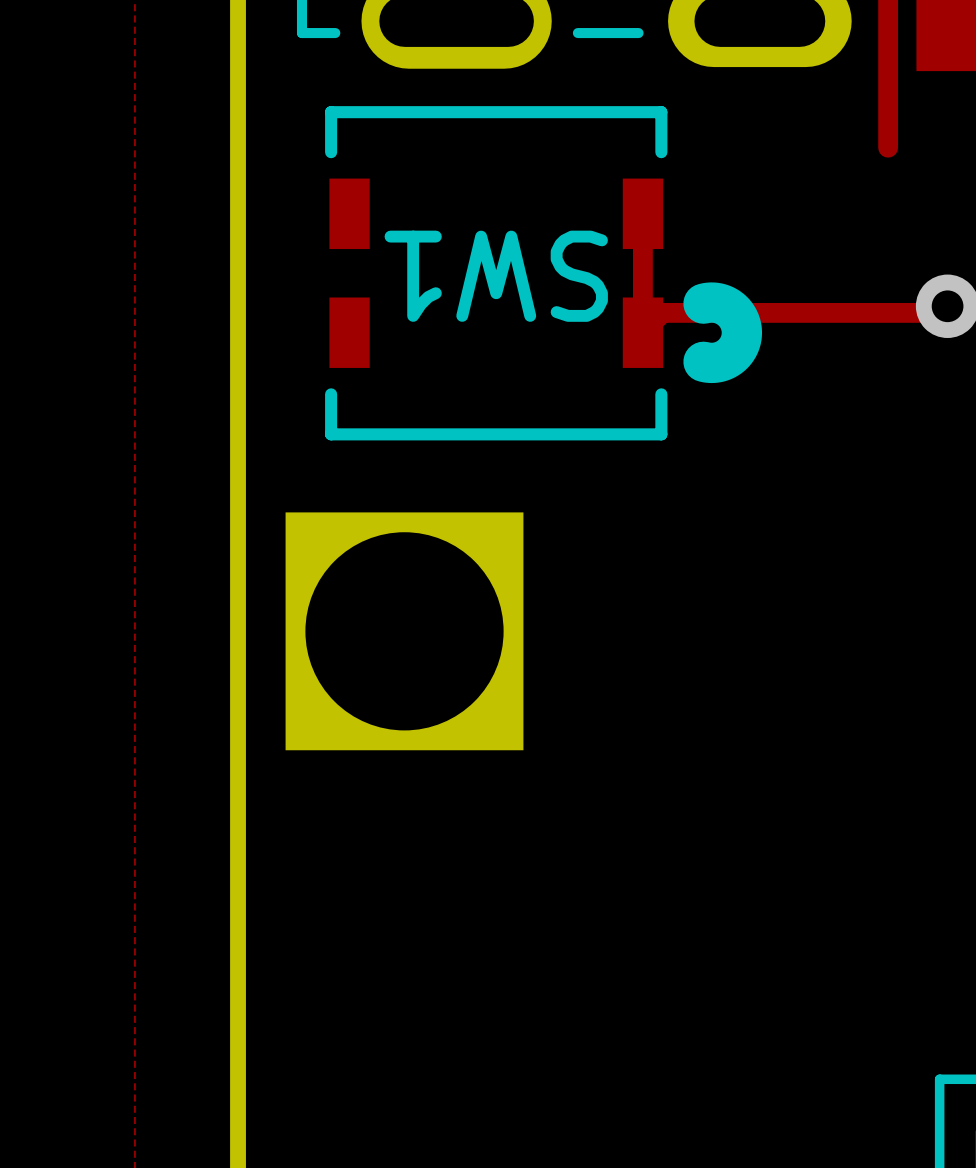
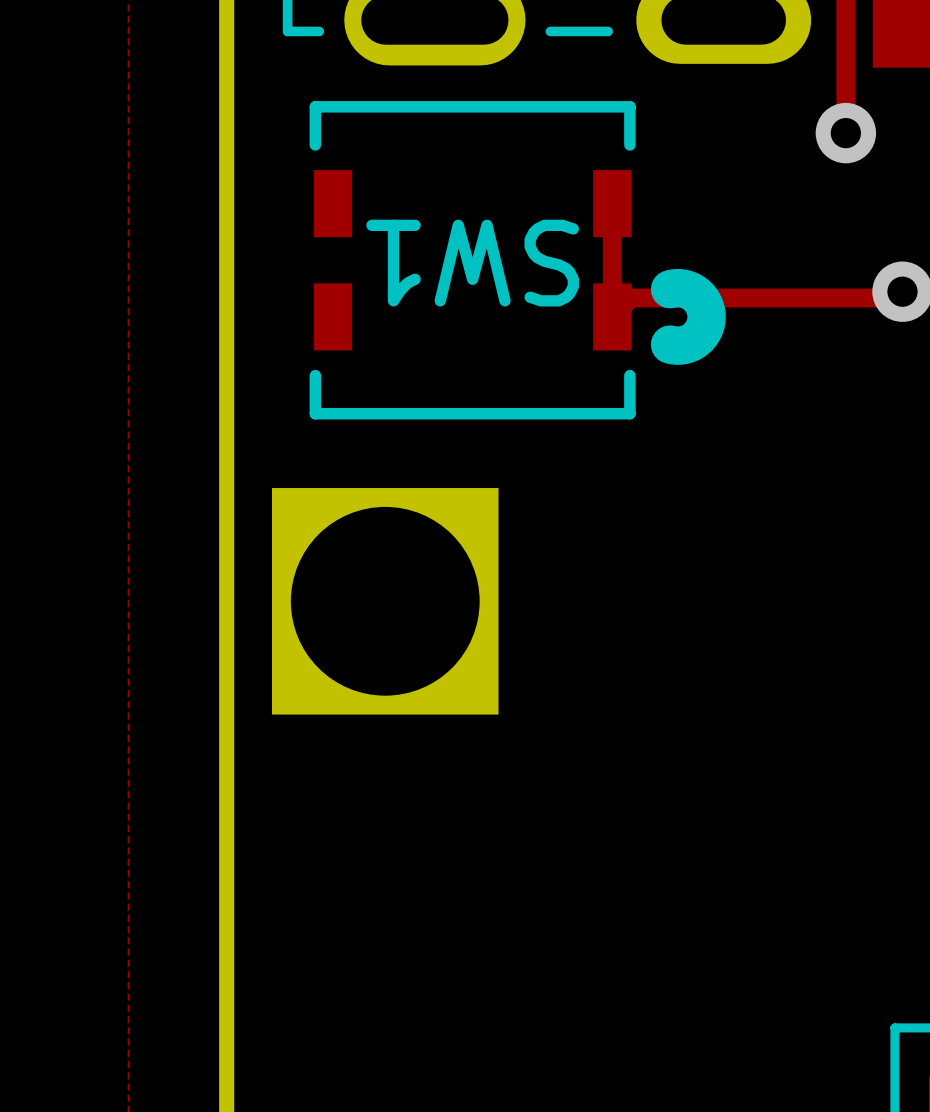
via: none -> (845, 133)

